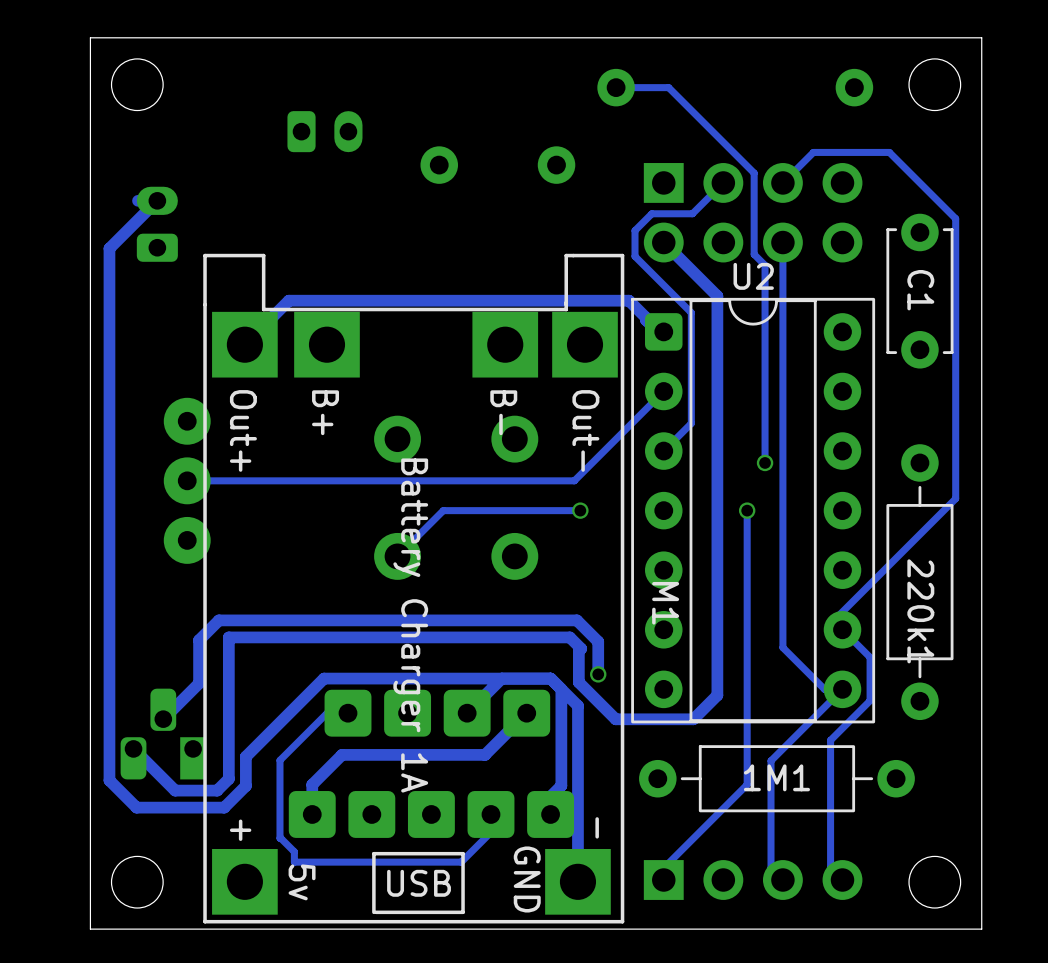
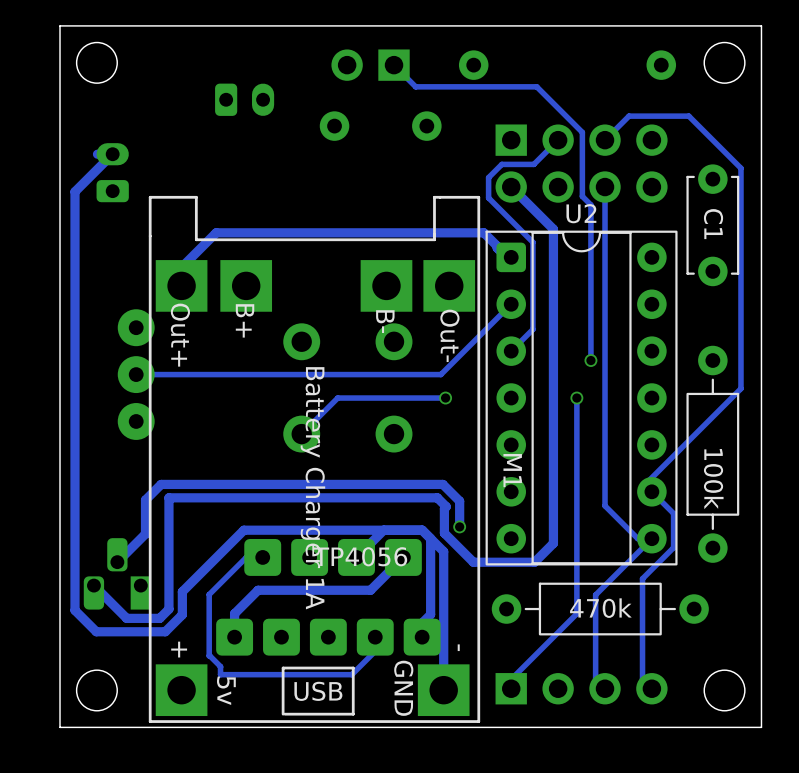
part: none -> (370, 65)
track: (616, 87) (668, 87) (696, 115) -> (394, 65) (415, 86) (536, 86)
M1 footprint: [203, 253, 625, 924] -> [148, 195, 481, 723]
220k1 name: 220k1 (920, 611) -> 100k (713, 479)
1M1 name: 1M1 (776, 777) -> 470k (600, 608)

